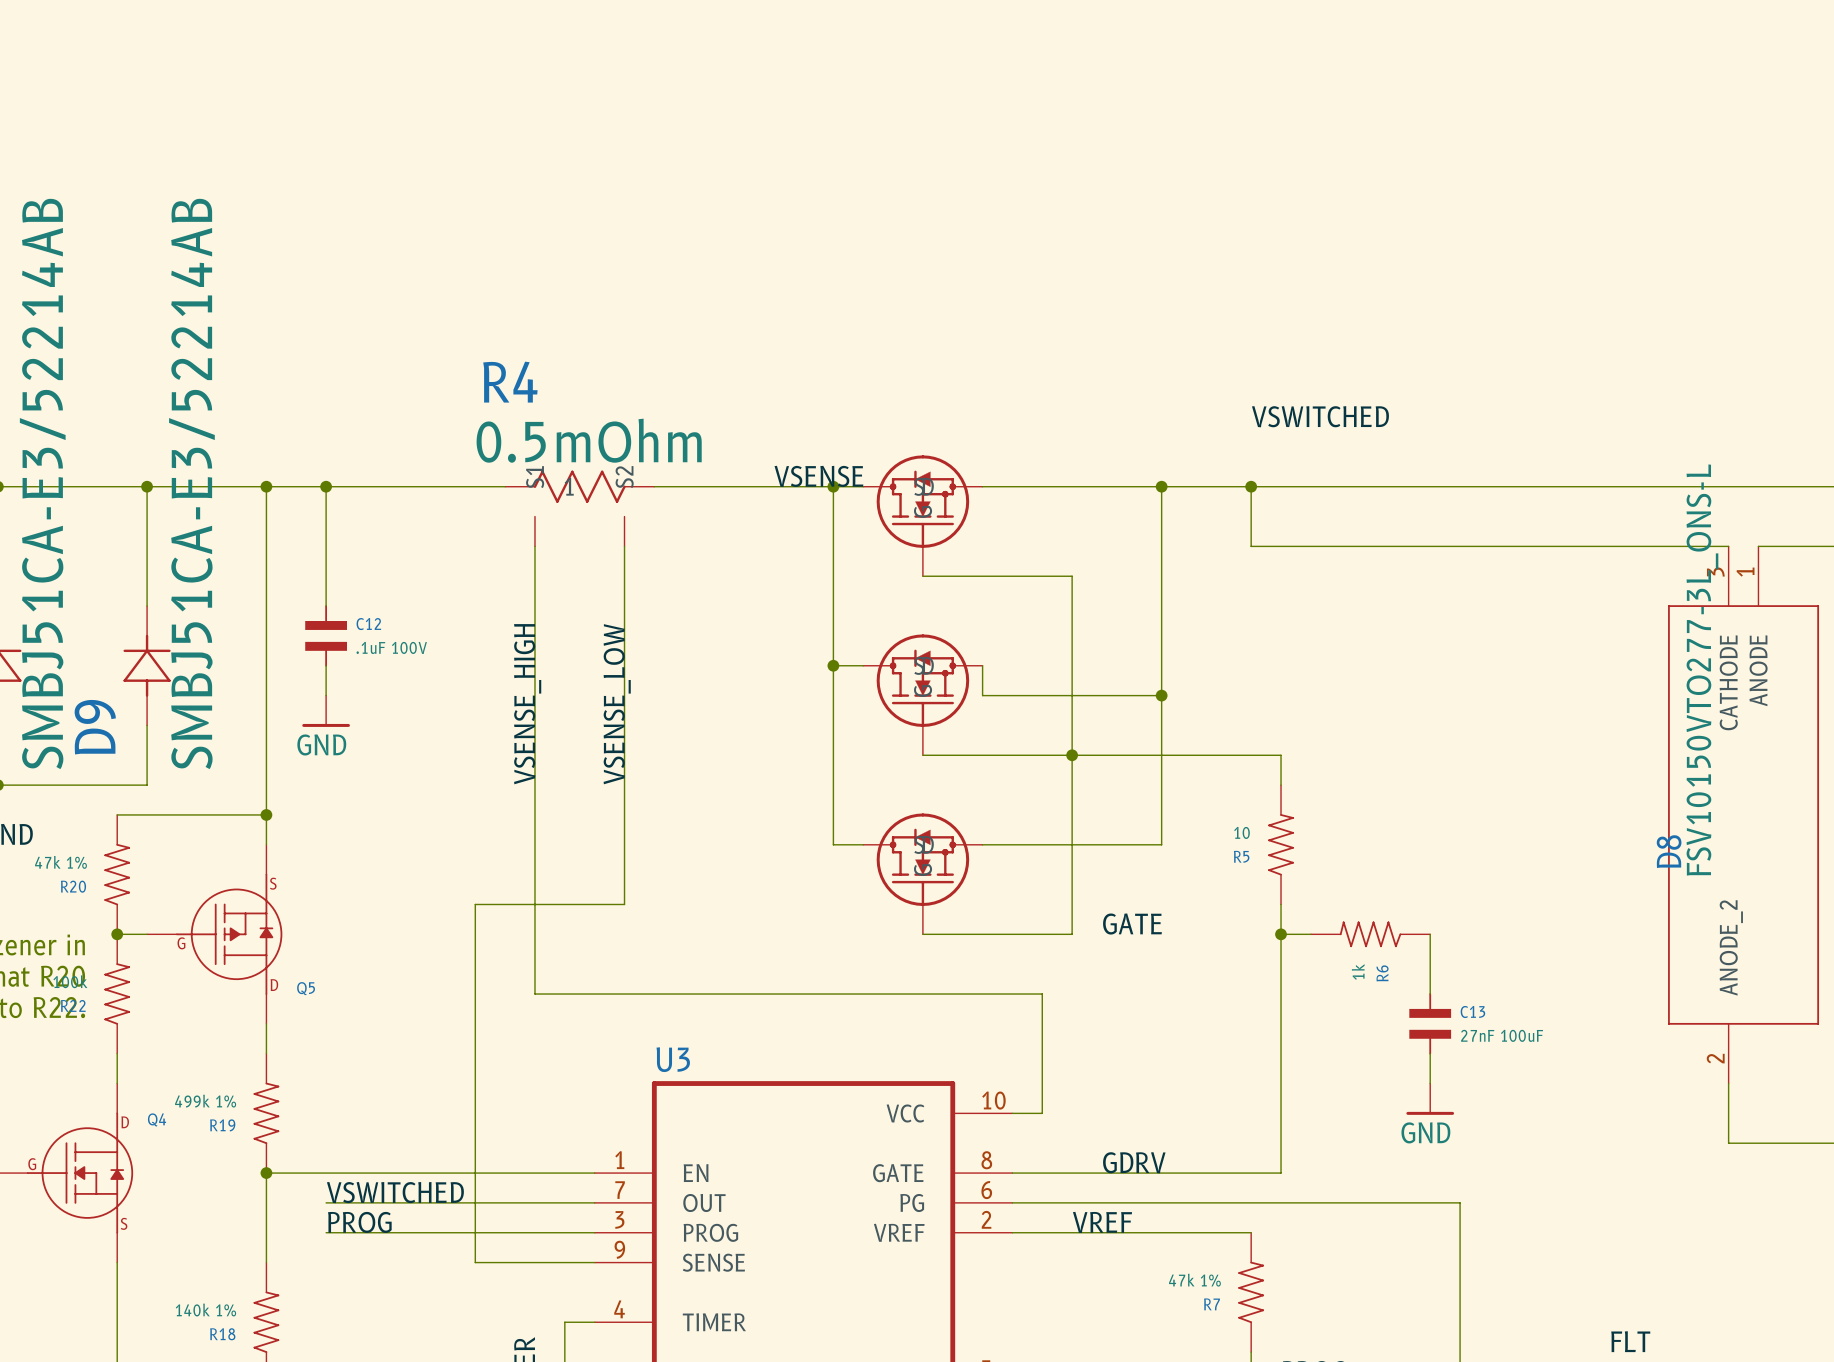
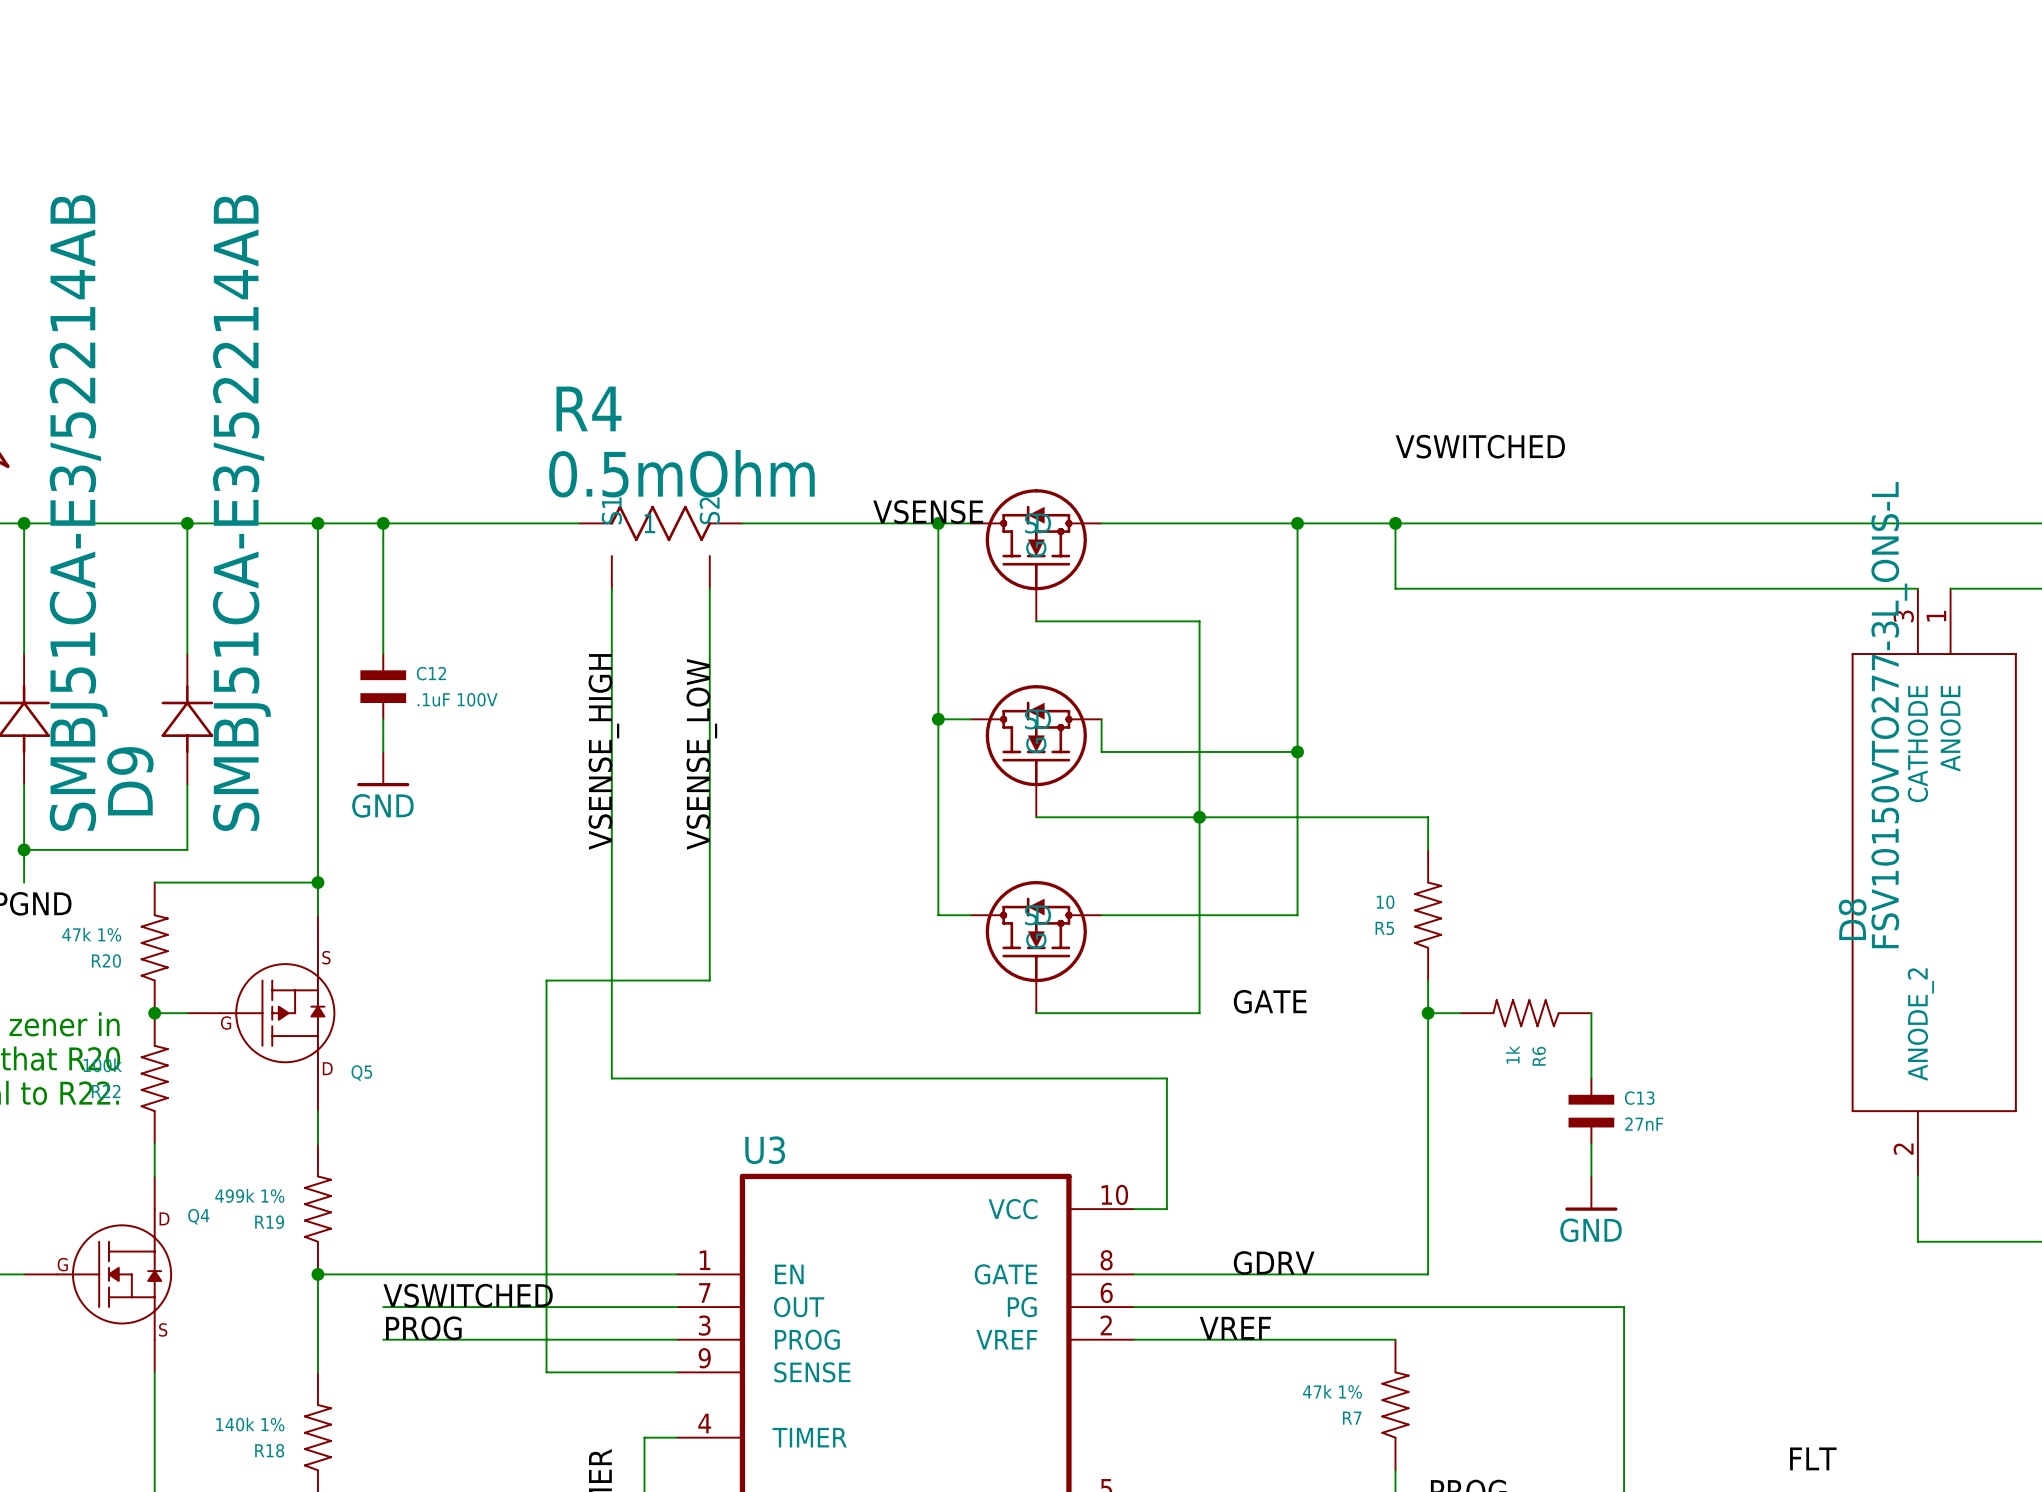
C13 value: 27nF 100uF (1502, 1035) -> 27nF (1644, 1124)

